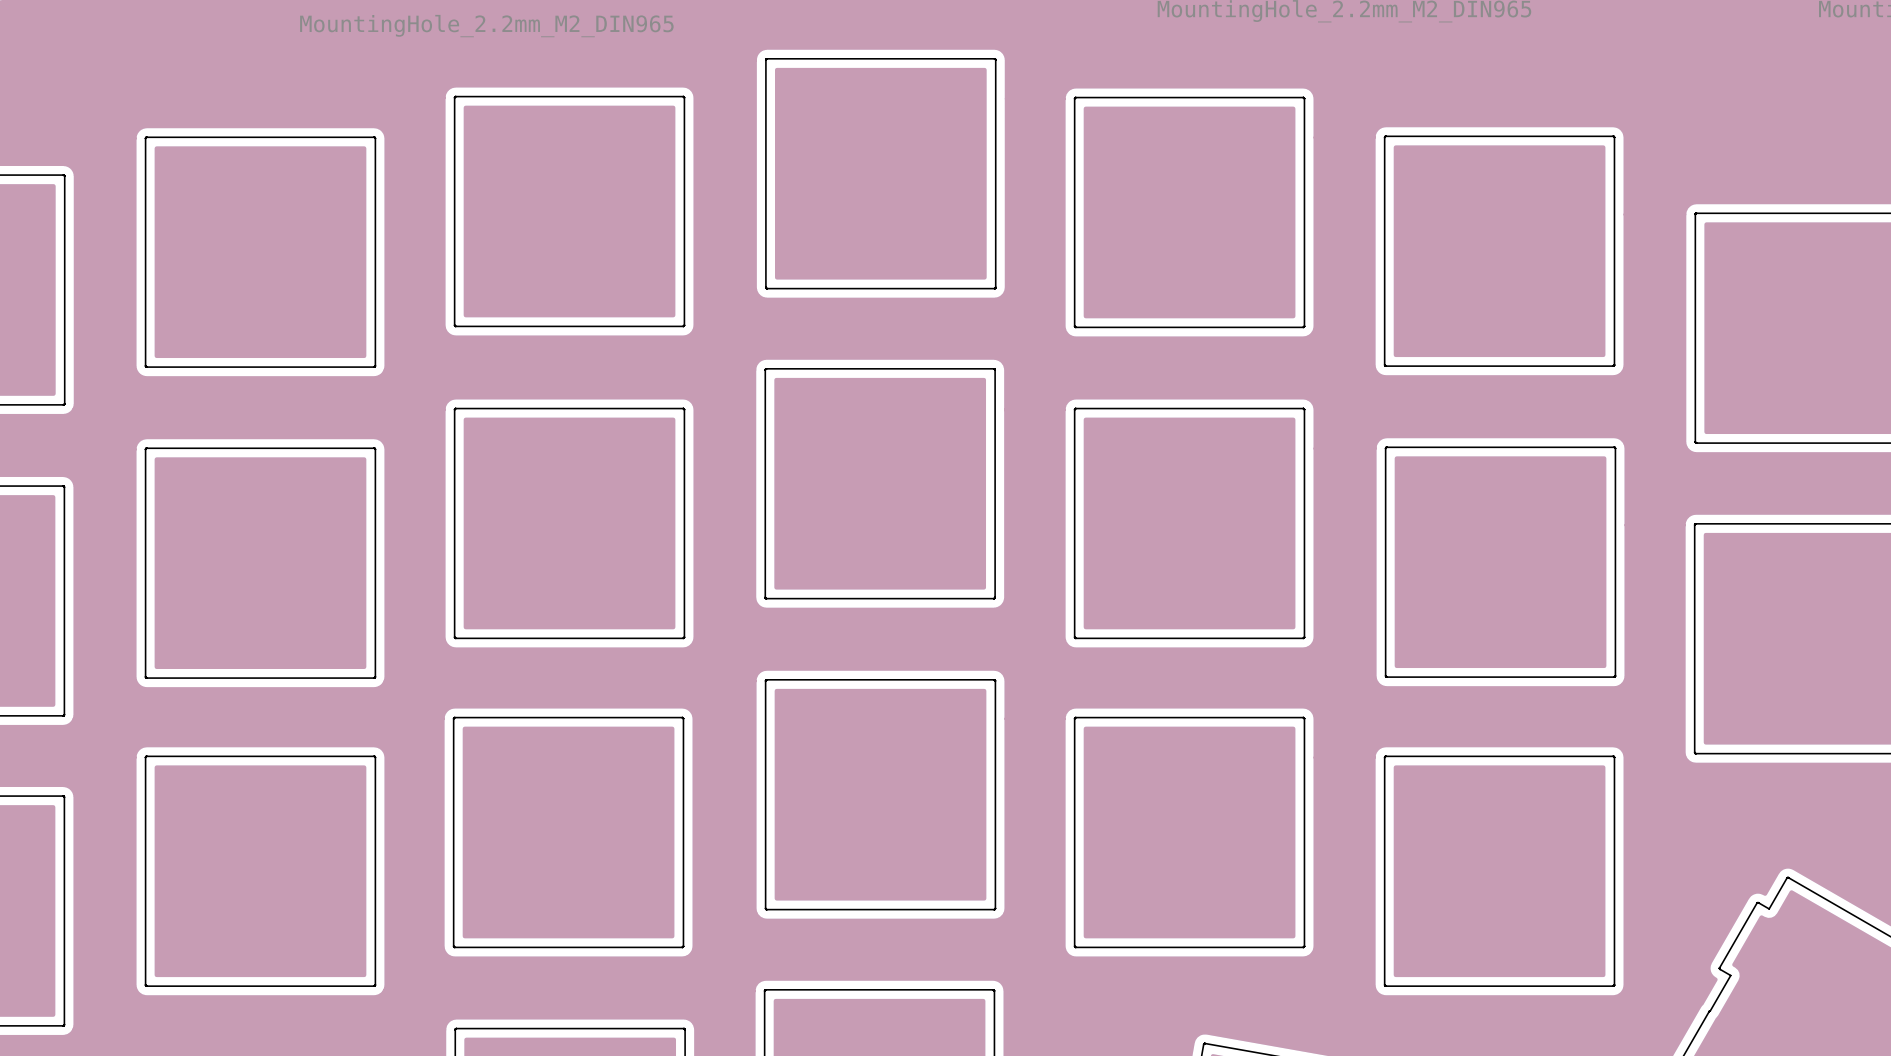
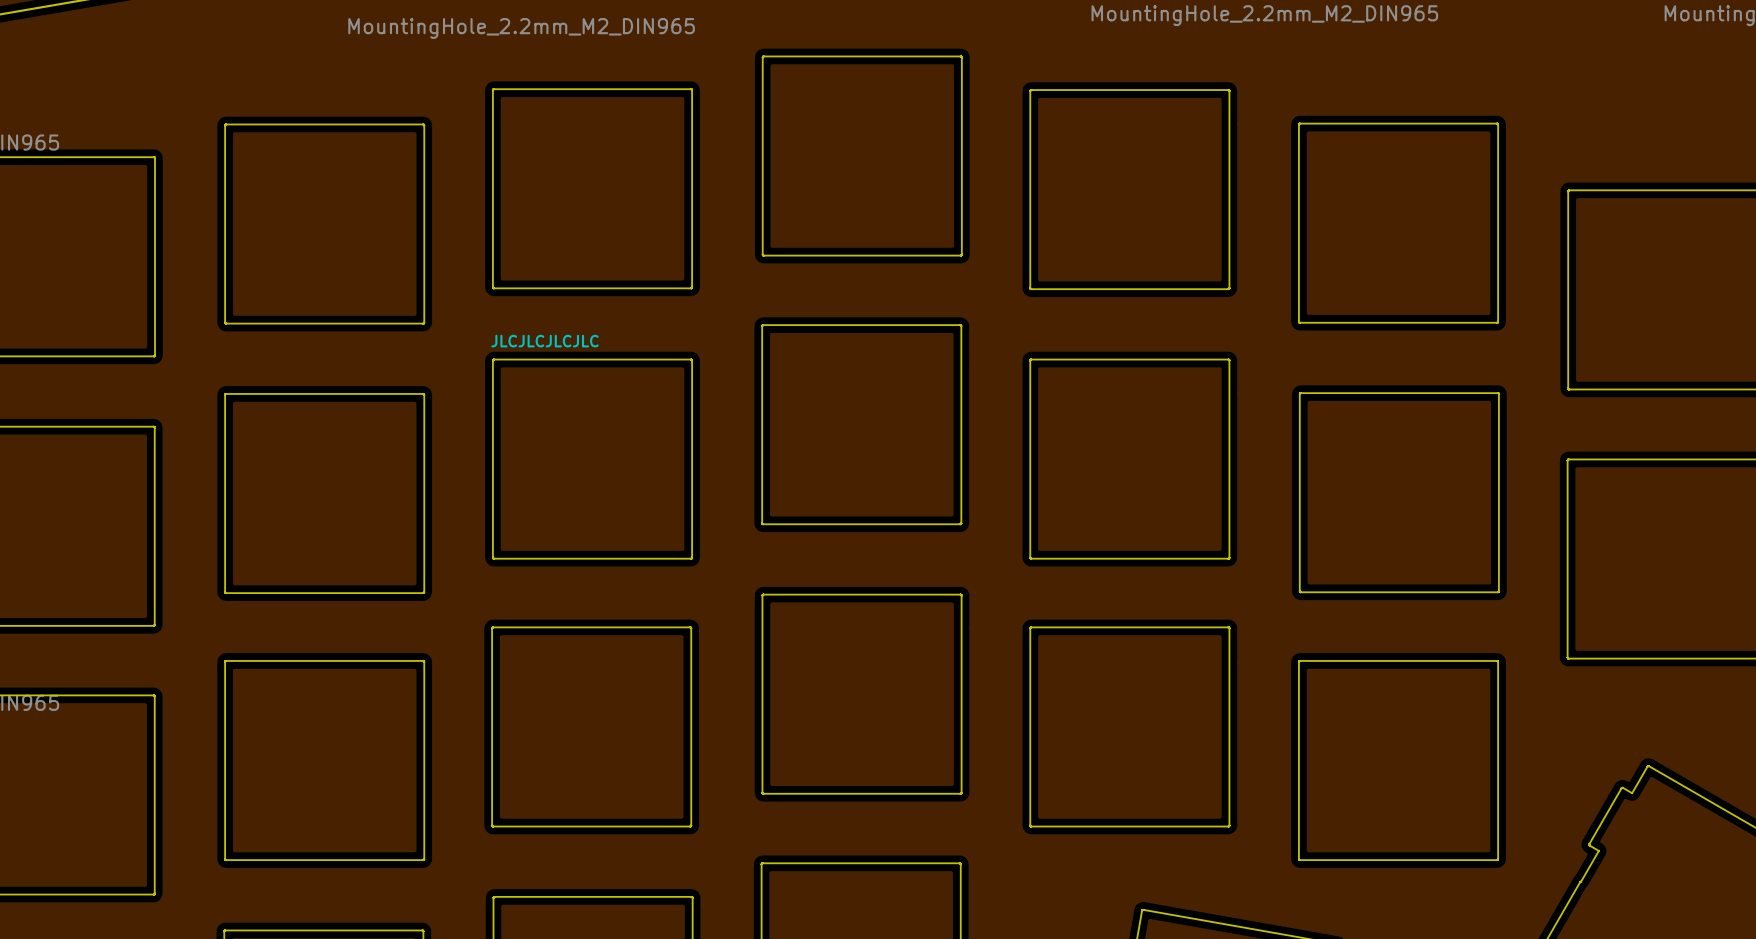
text: none -> JLCJLCJLCJLC (544, 341)

